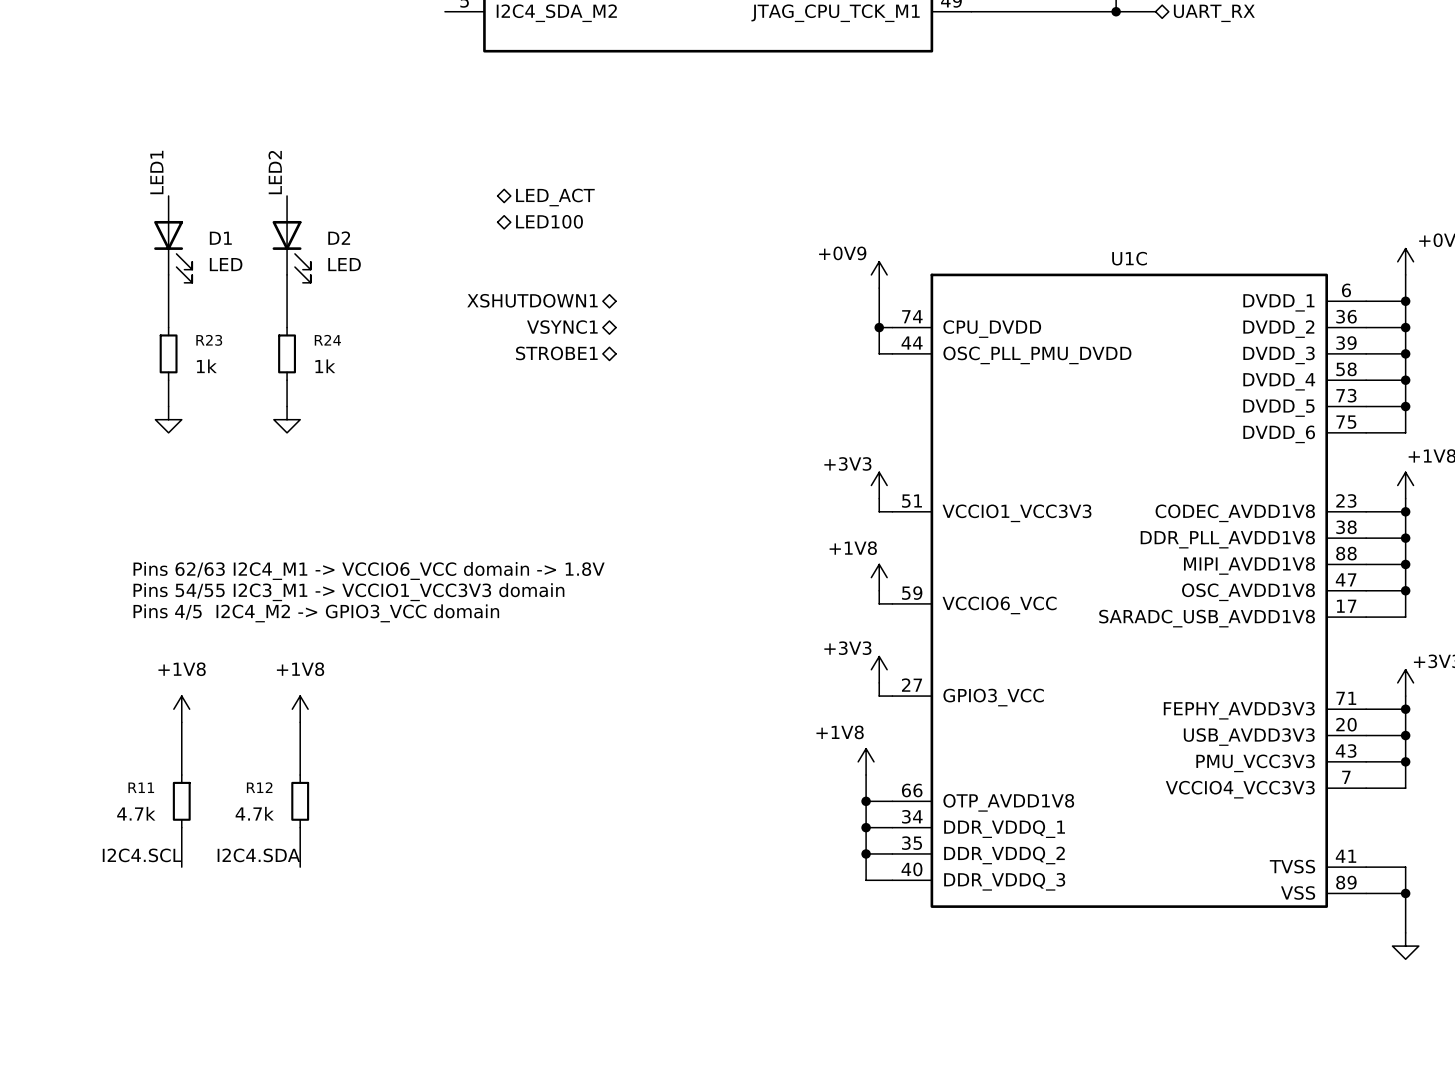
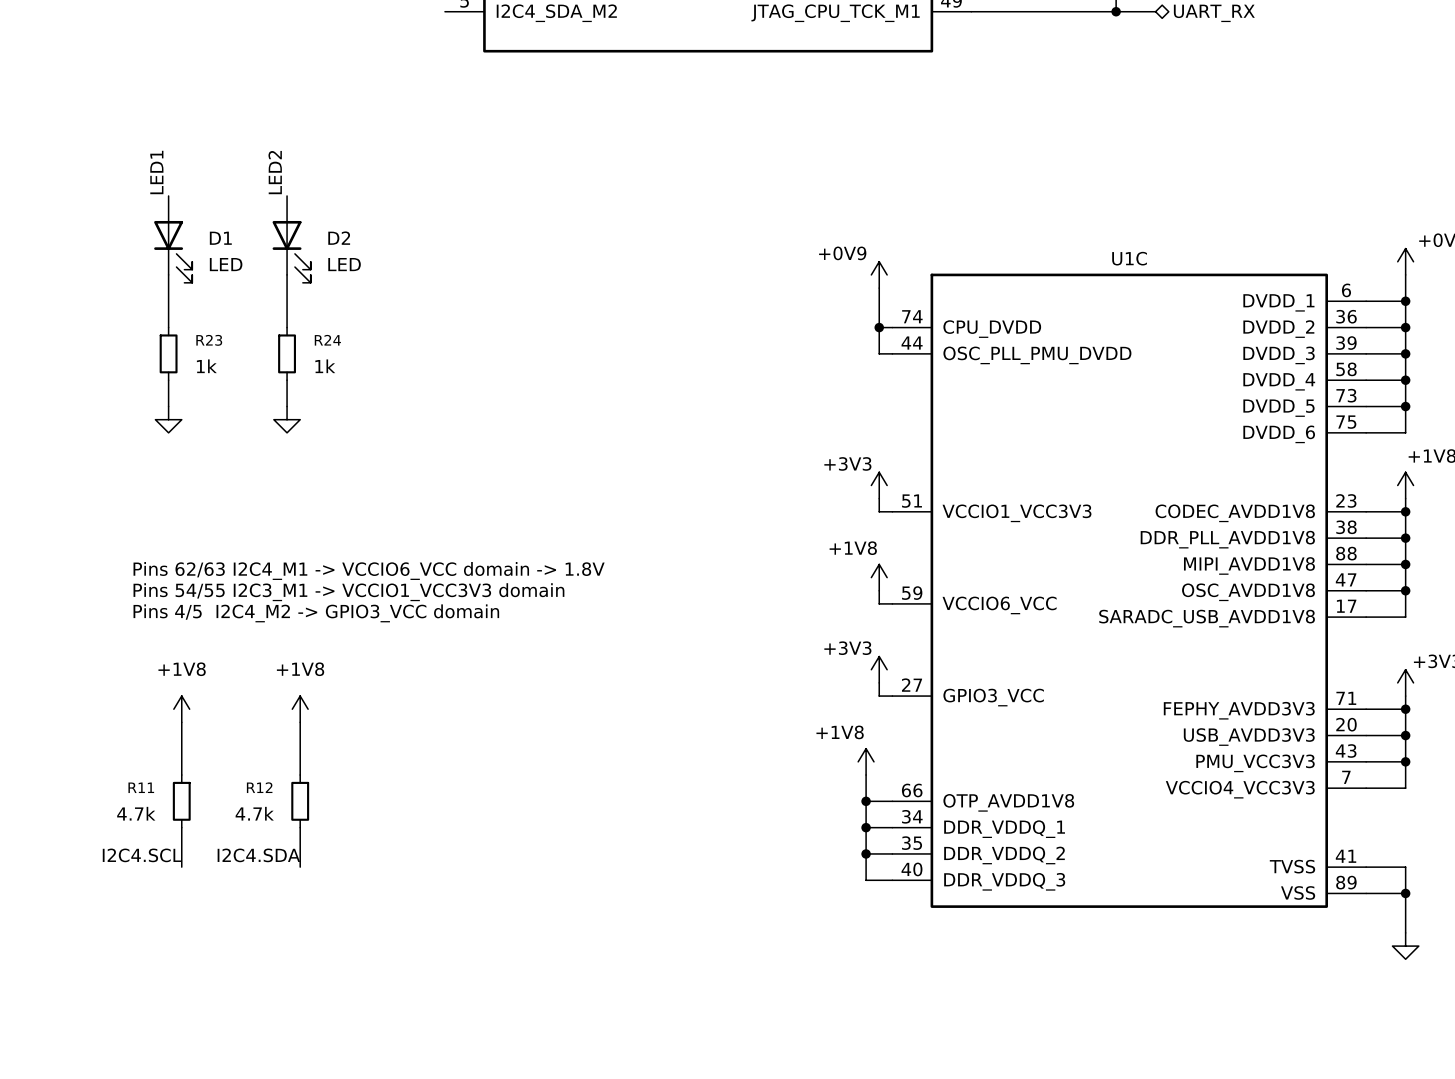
hierarchical label: LED_ACT (555, 197) -> none
hierarchical label: LED100 (549, 221) -> none
hierarchical label: XSHUTDOWN1 (532, 300) -> none
hierarchical label: VSYNC1 (562, 327) -> none
hierarchical label: STROBE1 (556, 353) -> none

